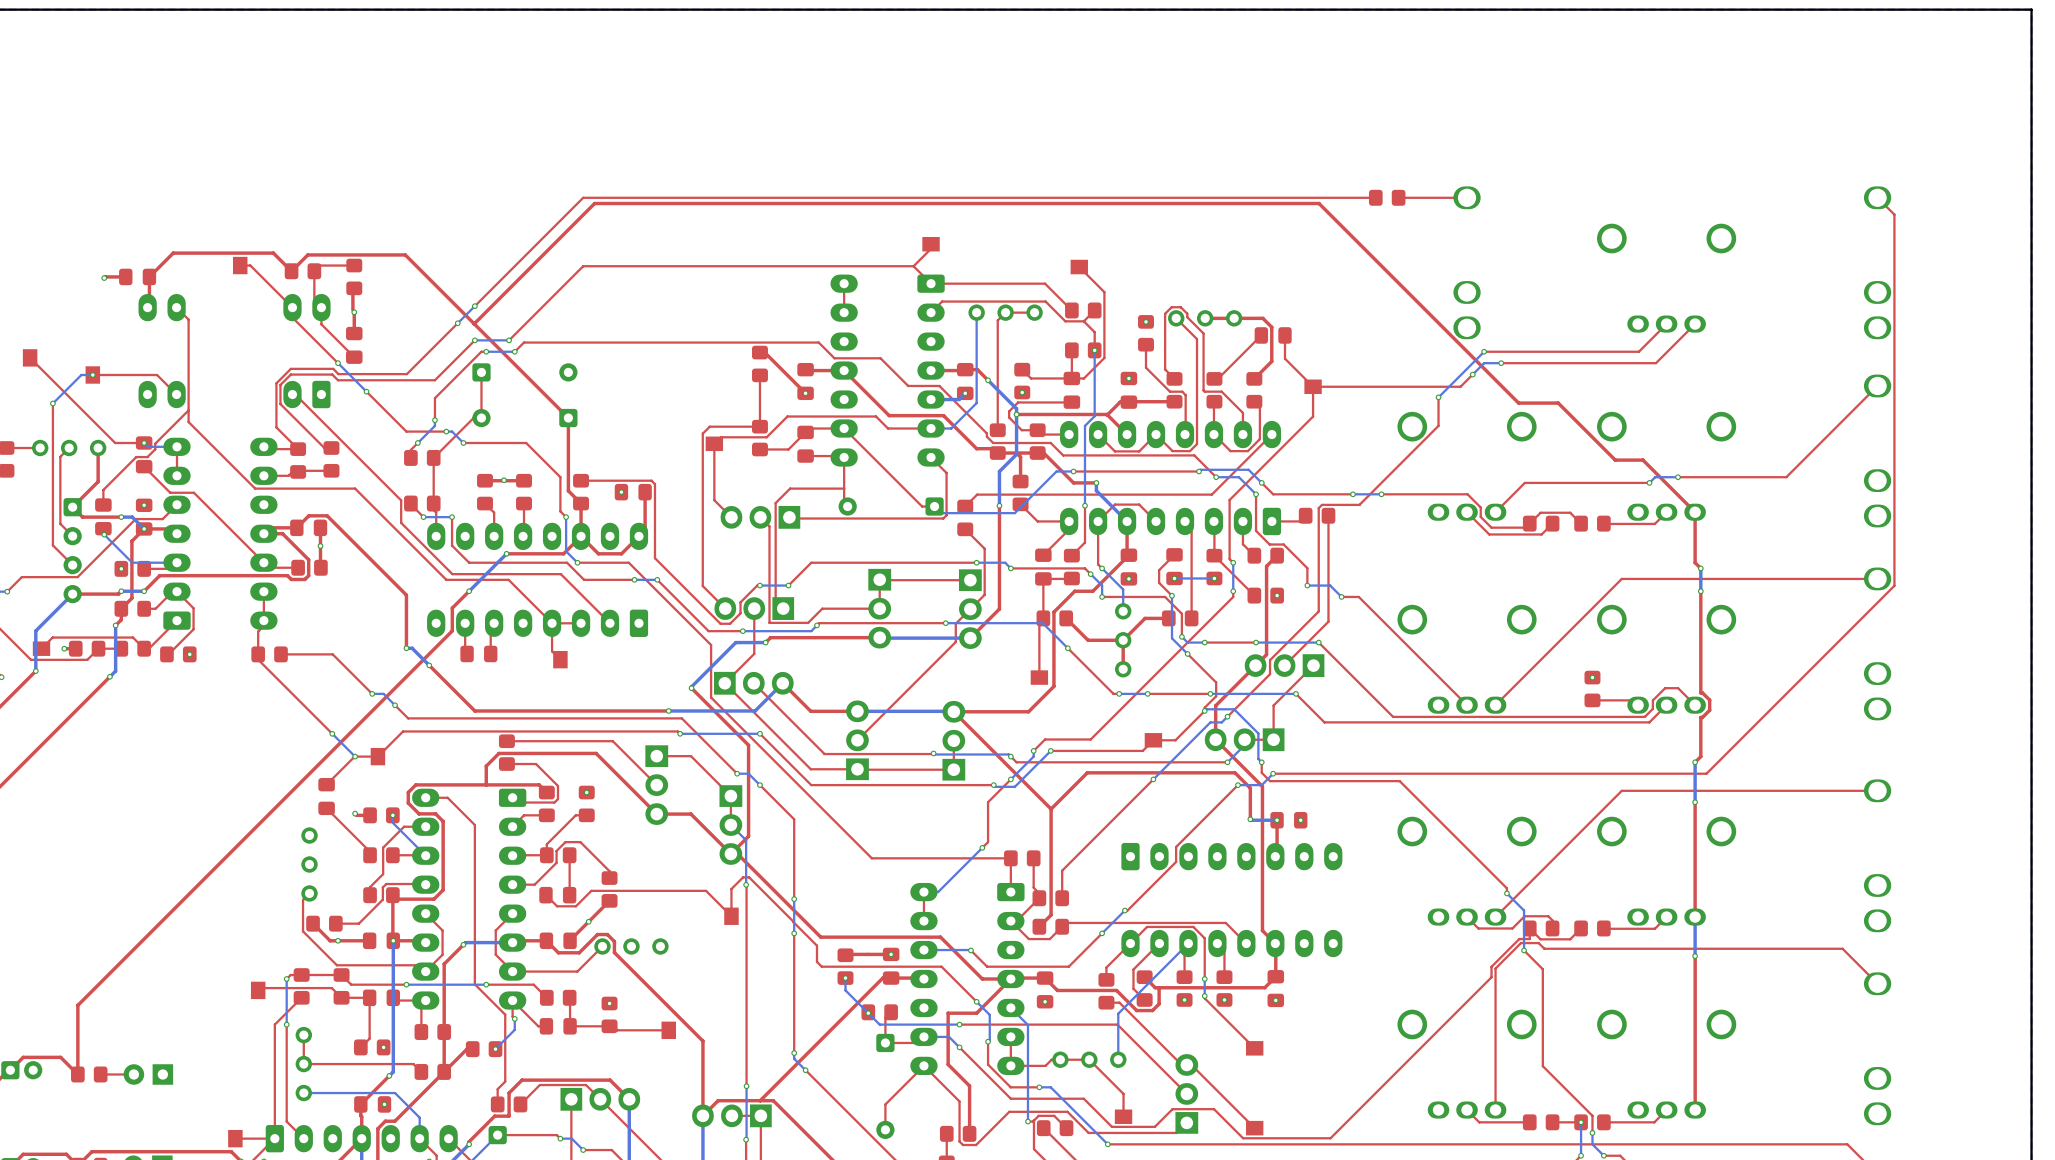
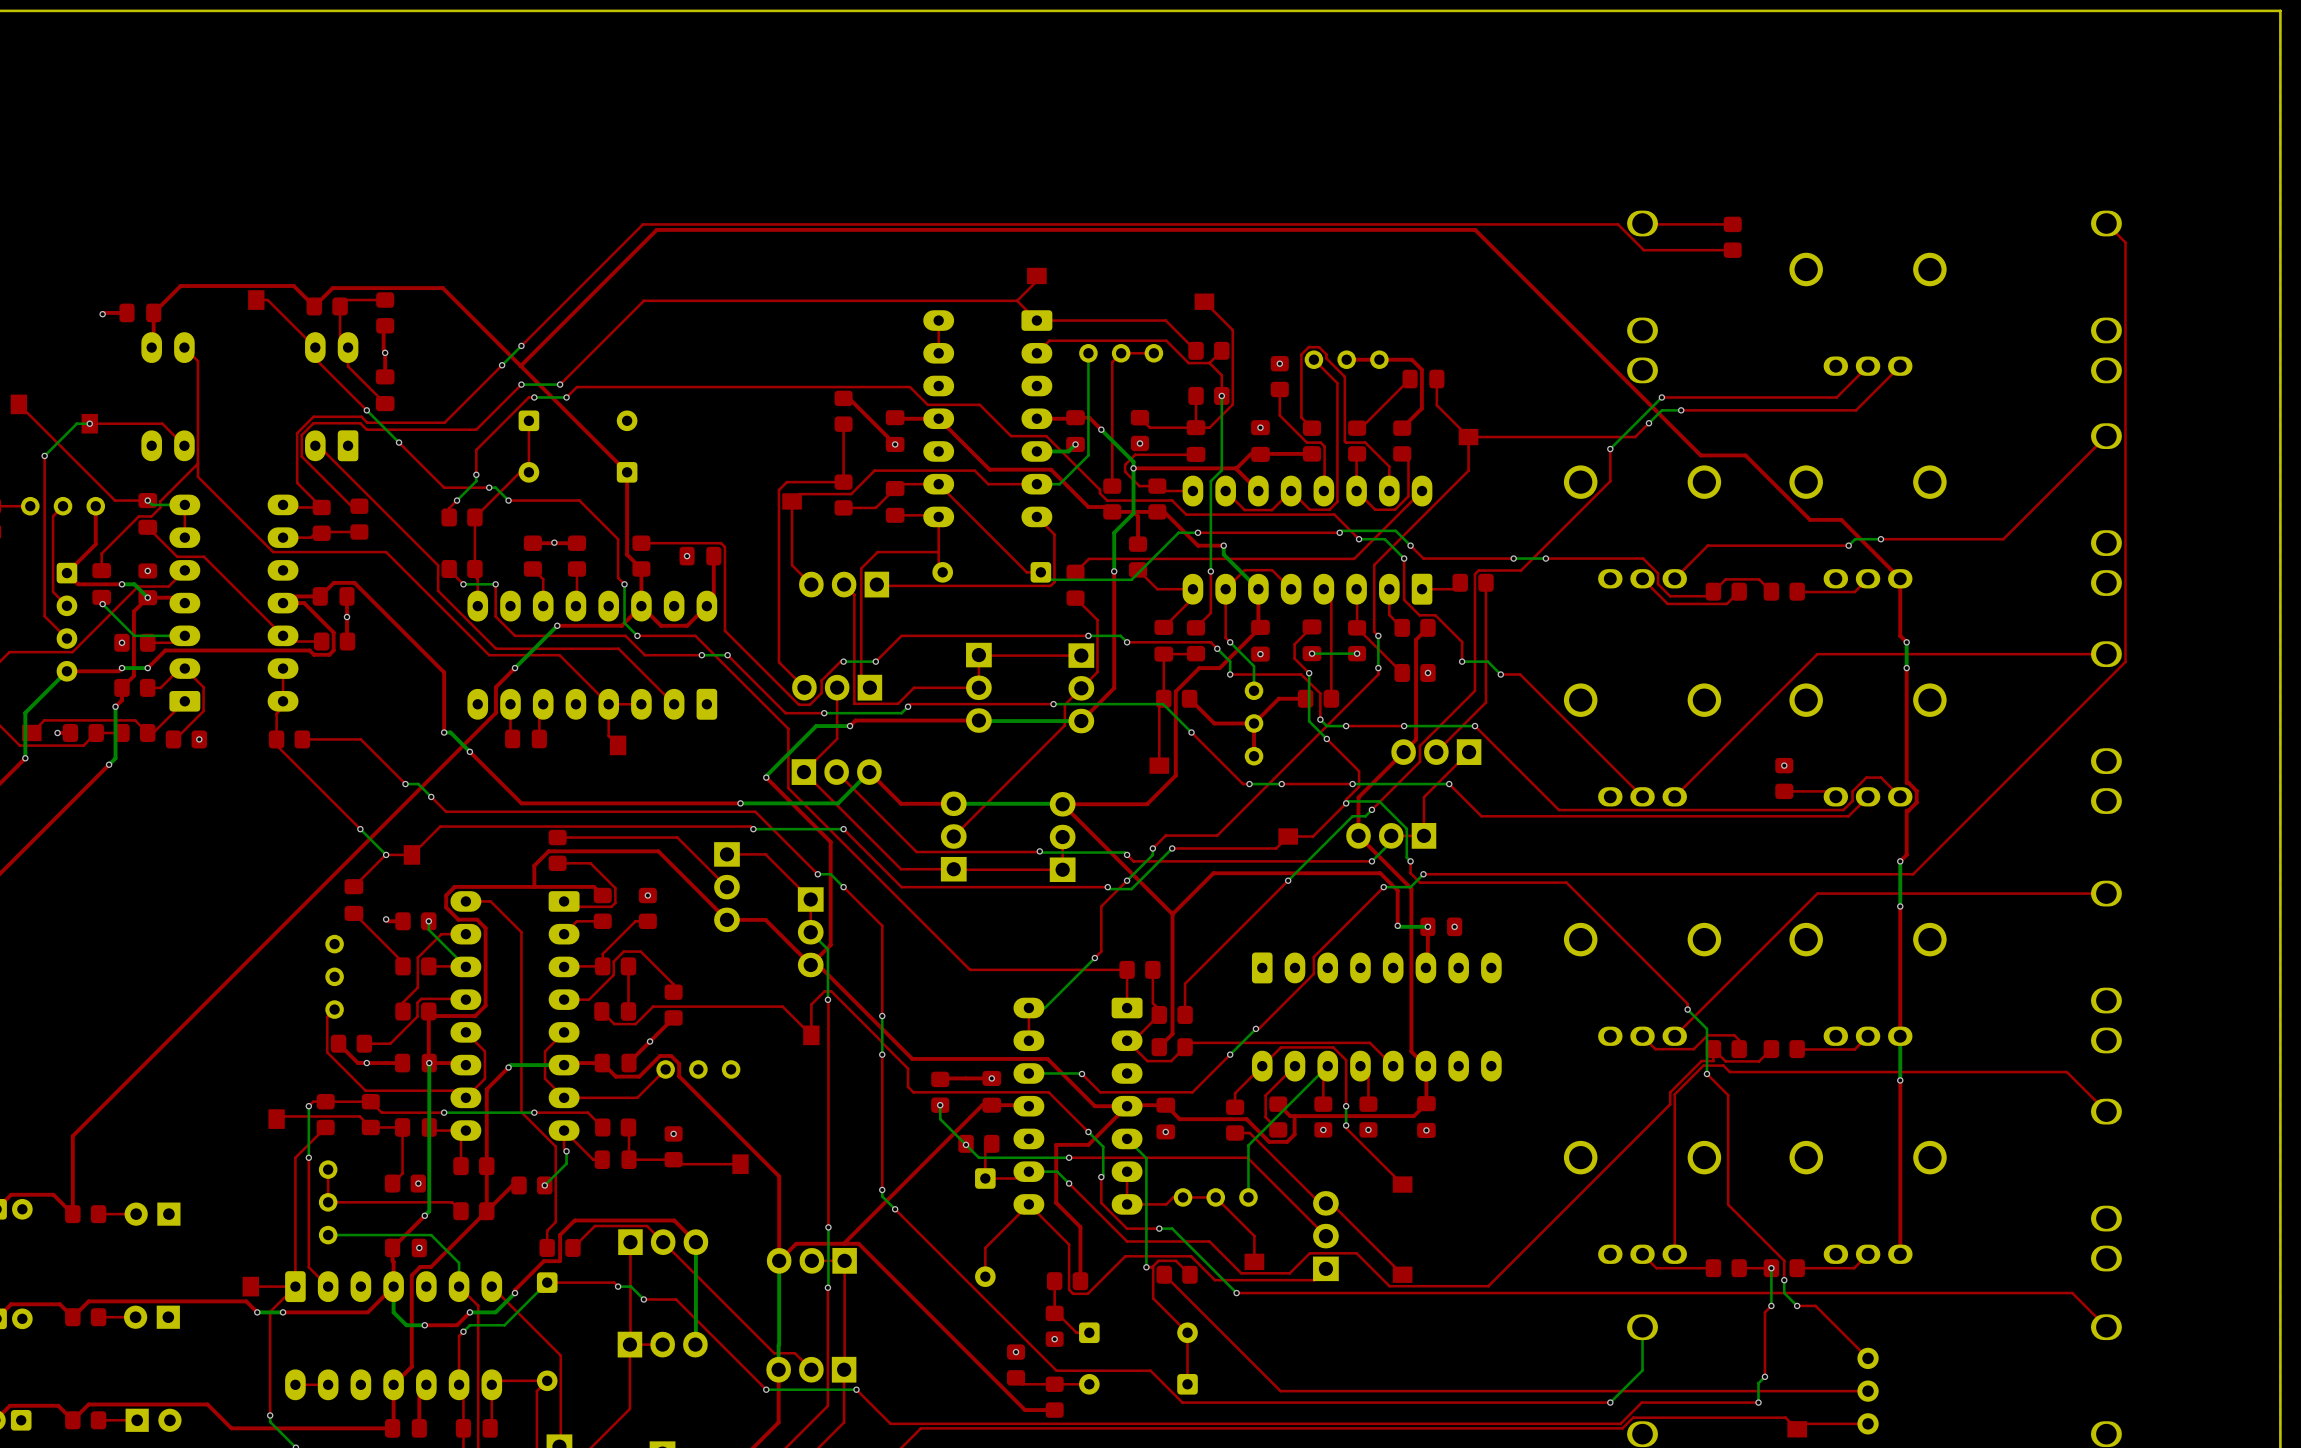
top track: (1375, 197) (582, 198) -> (1732, 250) (1643, 250) (1618, 224) (642, 224)
part rotation: 0° (1387, 197) -> 90° clockwise (1732, 237)
part position: (1387, 197) -> (1732, 237)
top track: (1467, 197) (1398, 197) -> none
top track: none -> (1732, 224) (1643, 224)

